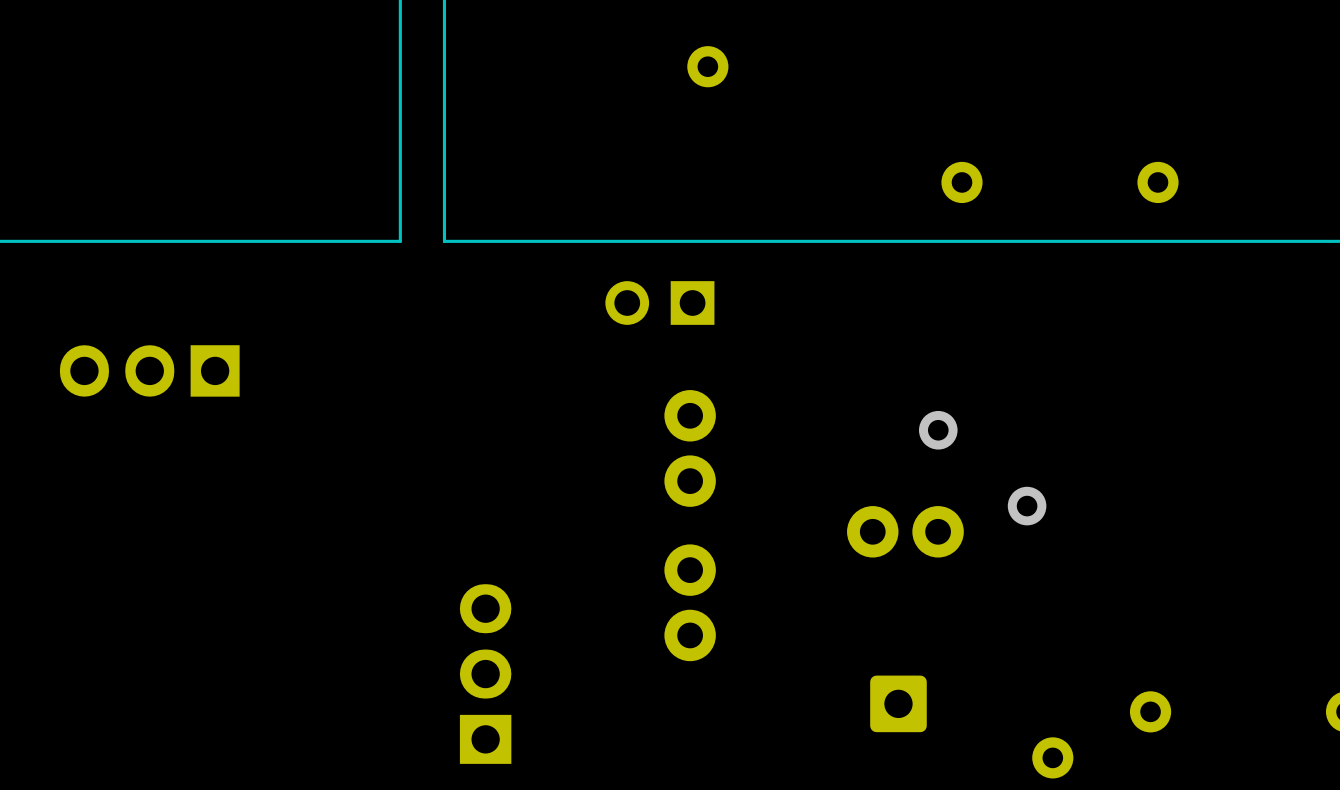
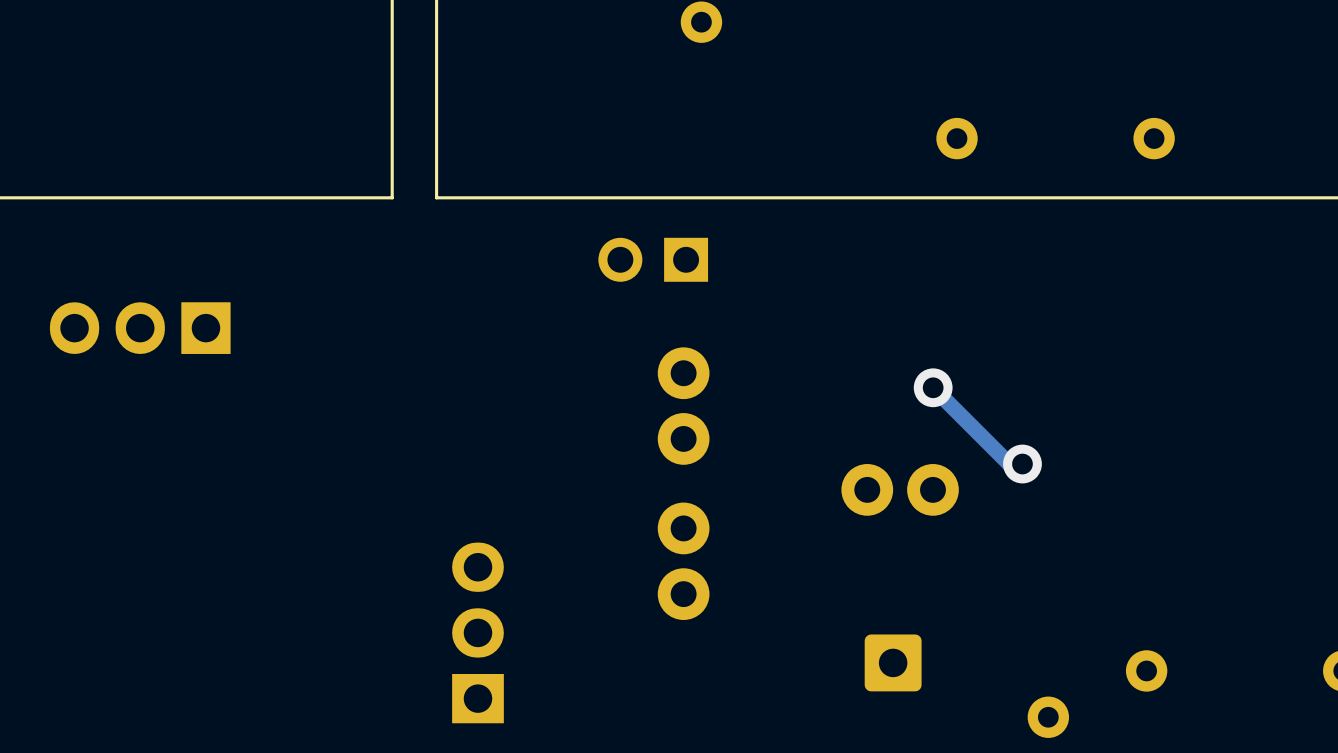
track: none -> (933, 387) (1009, 464) (1022, 464)

